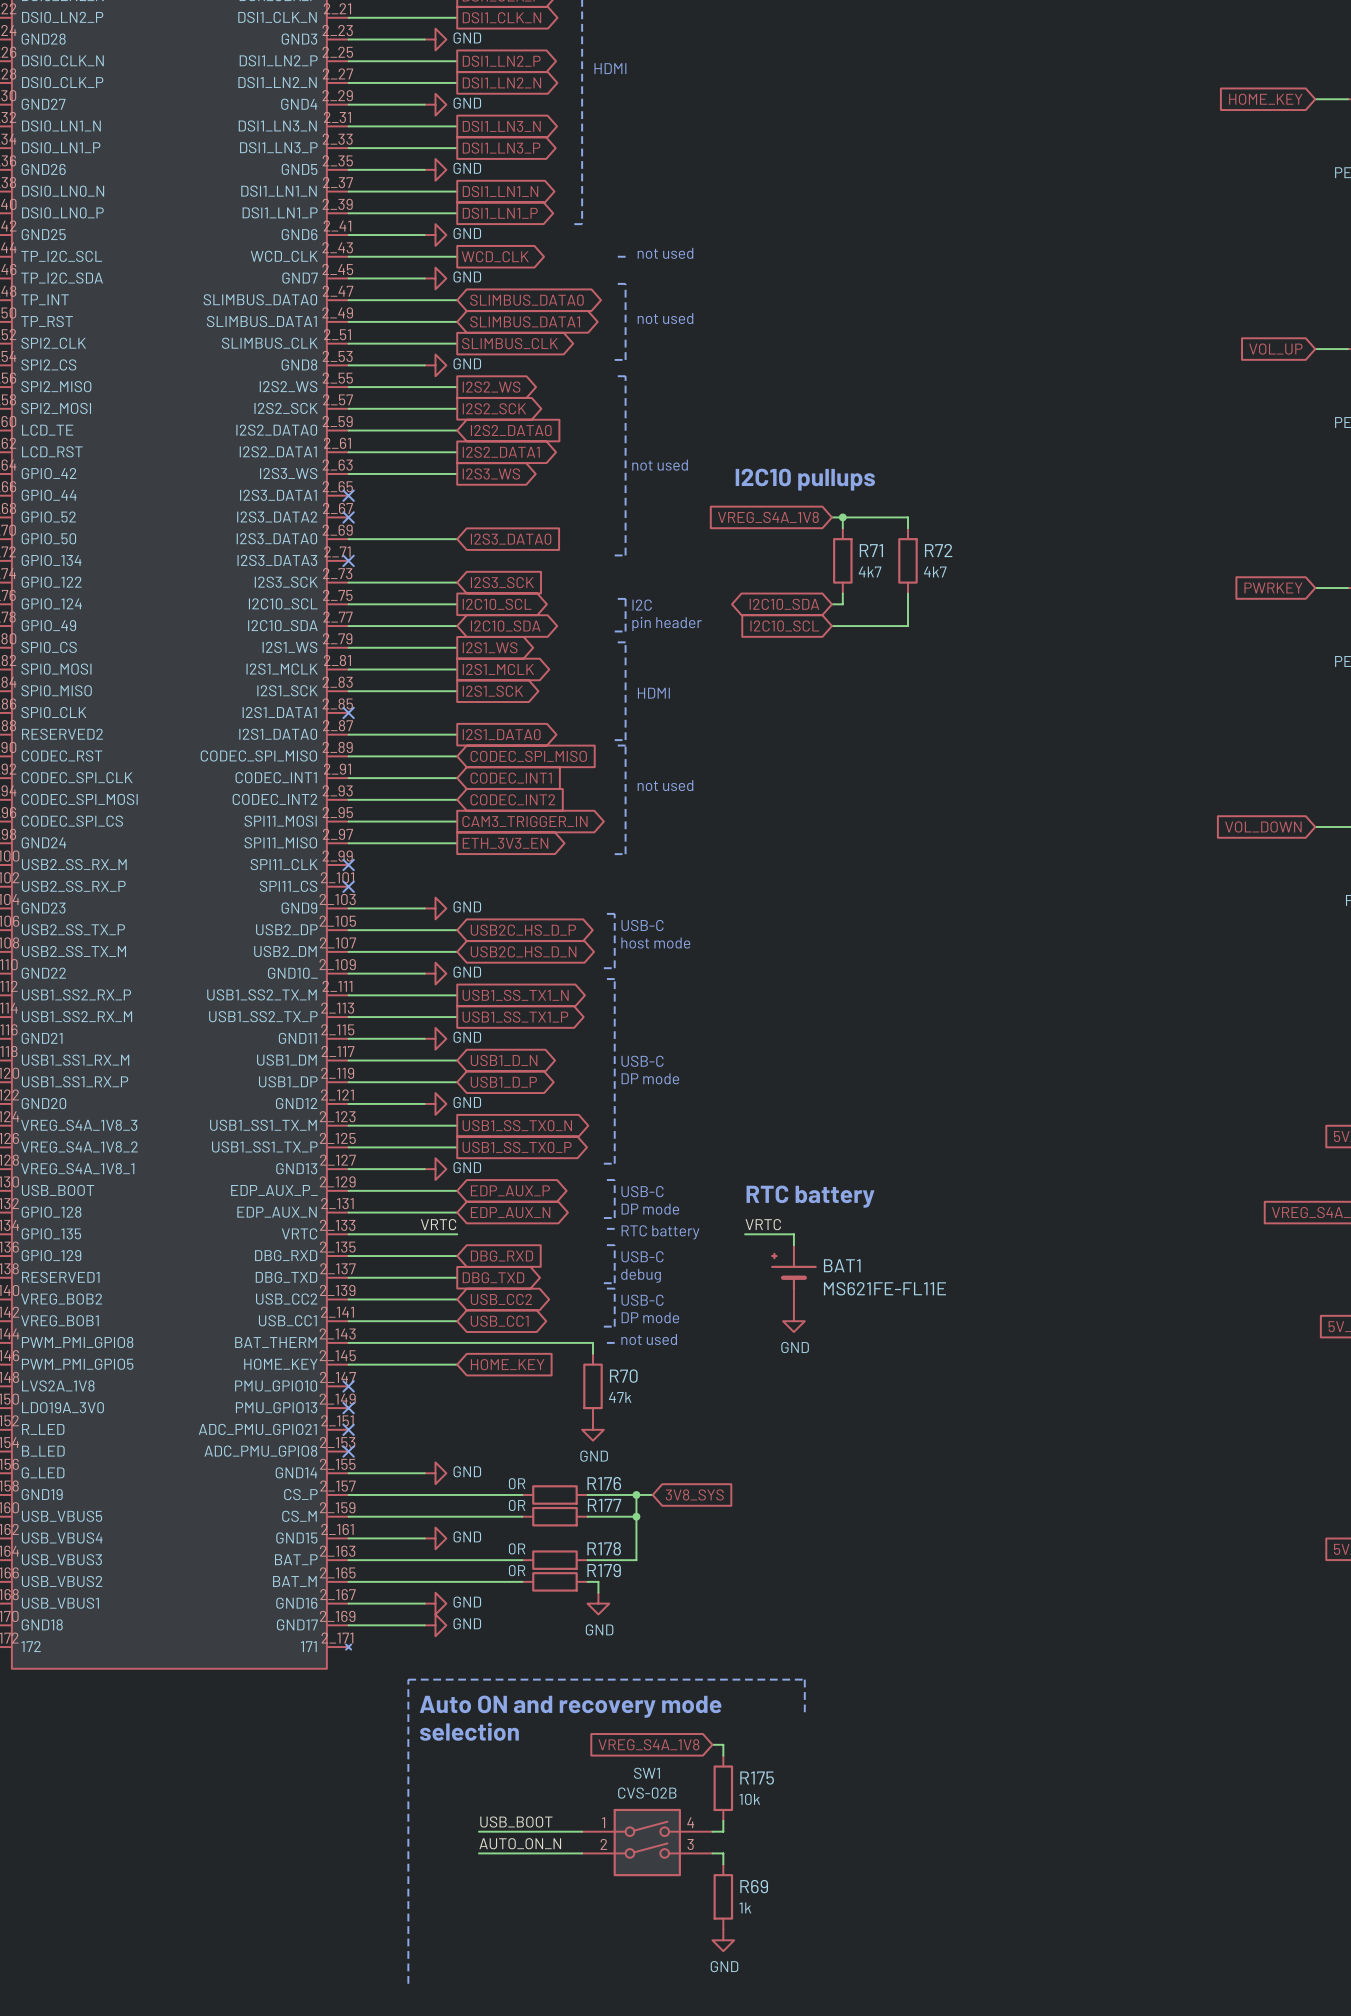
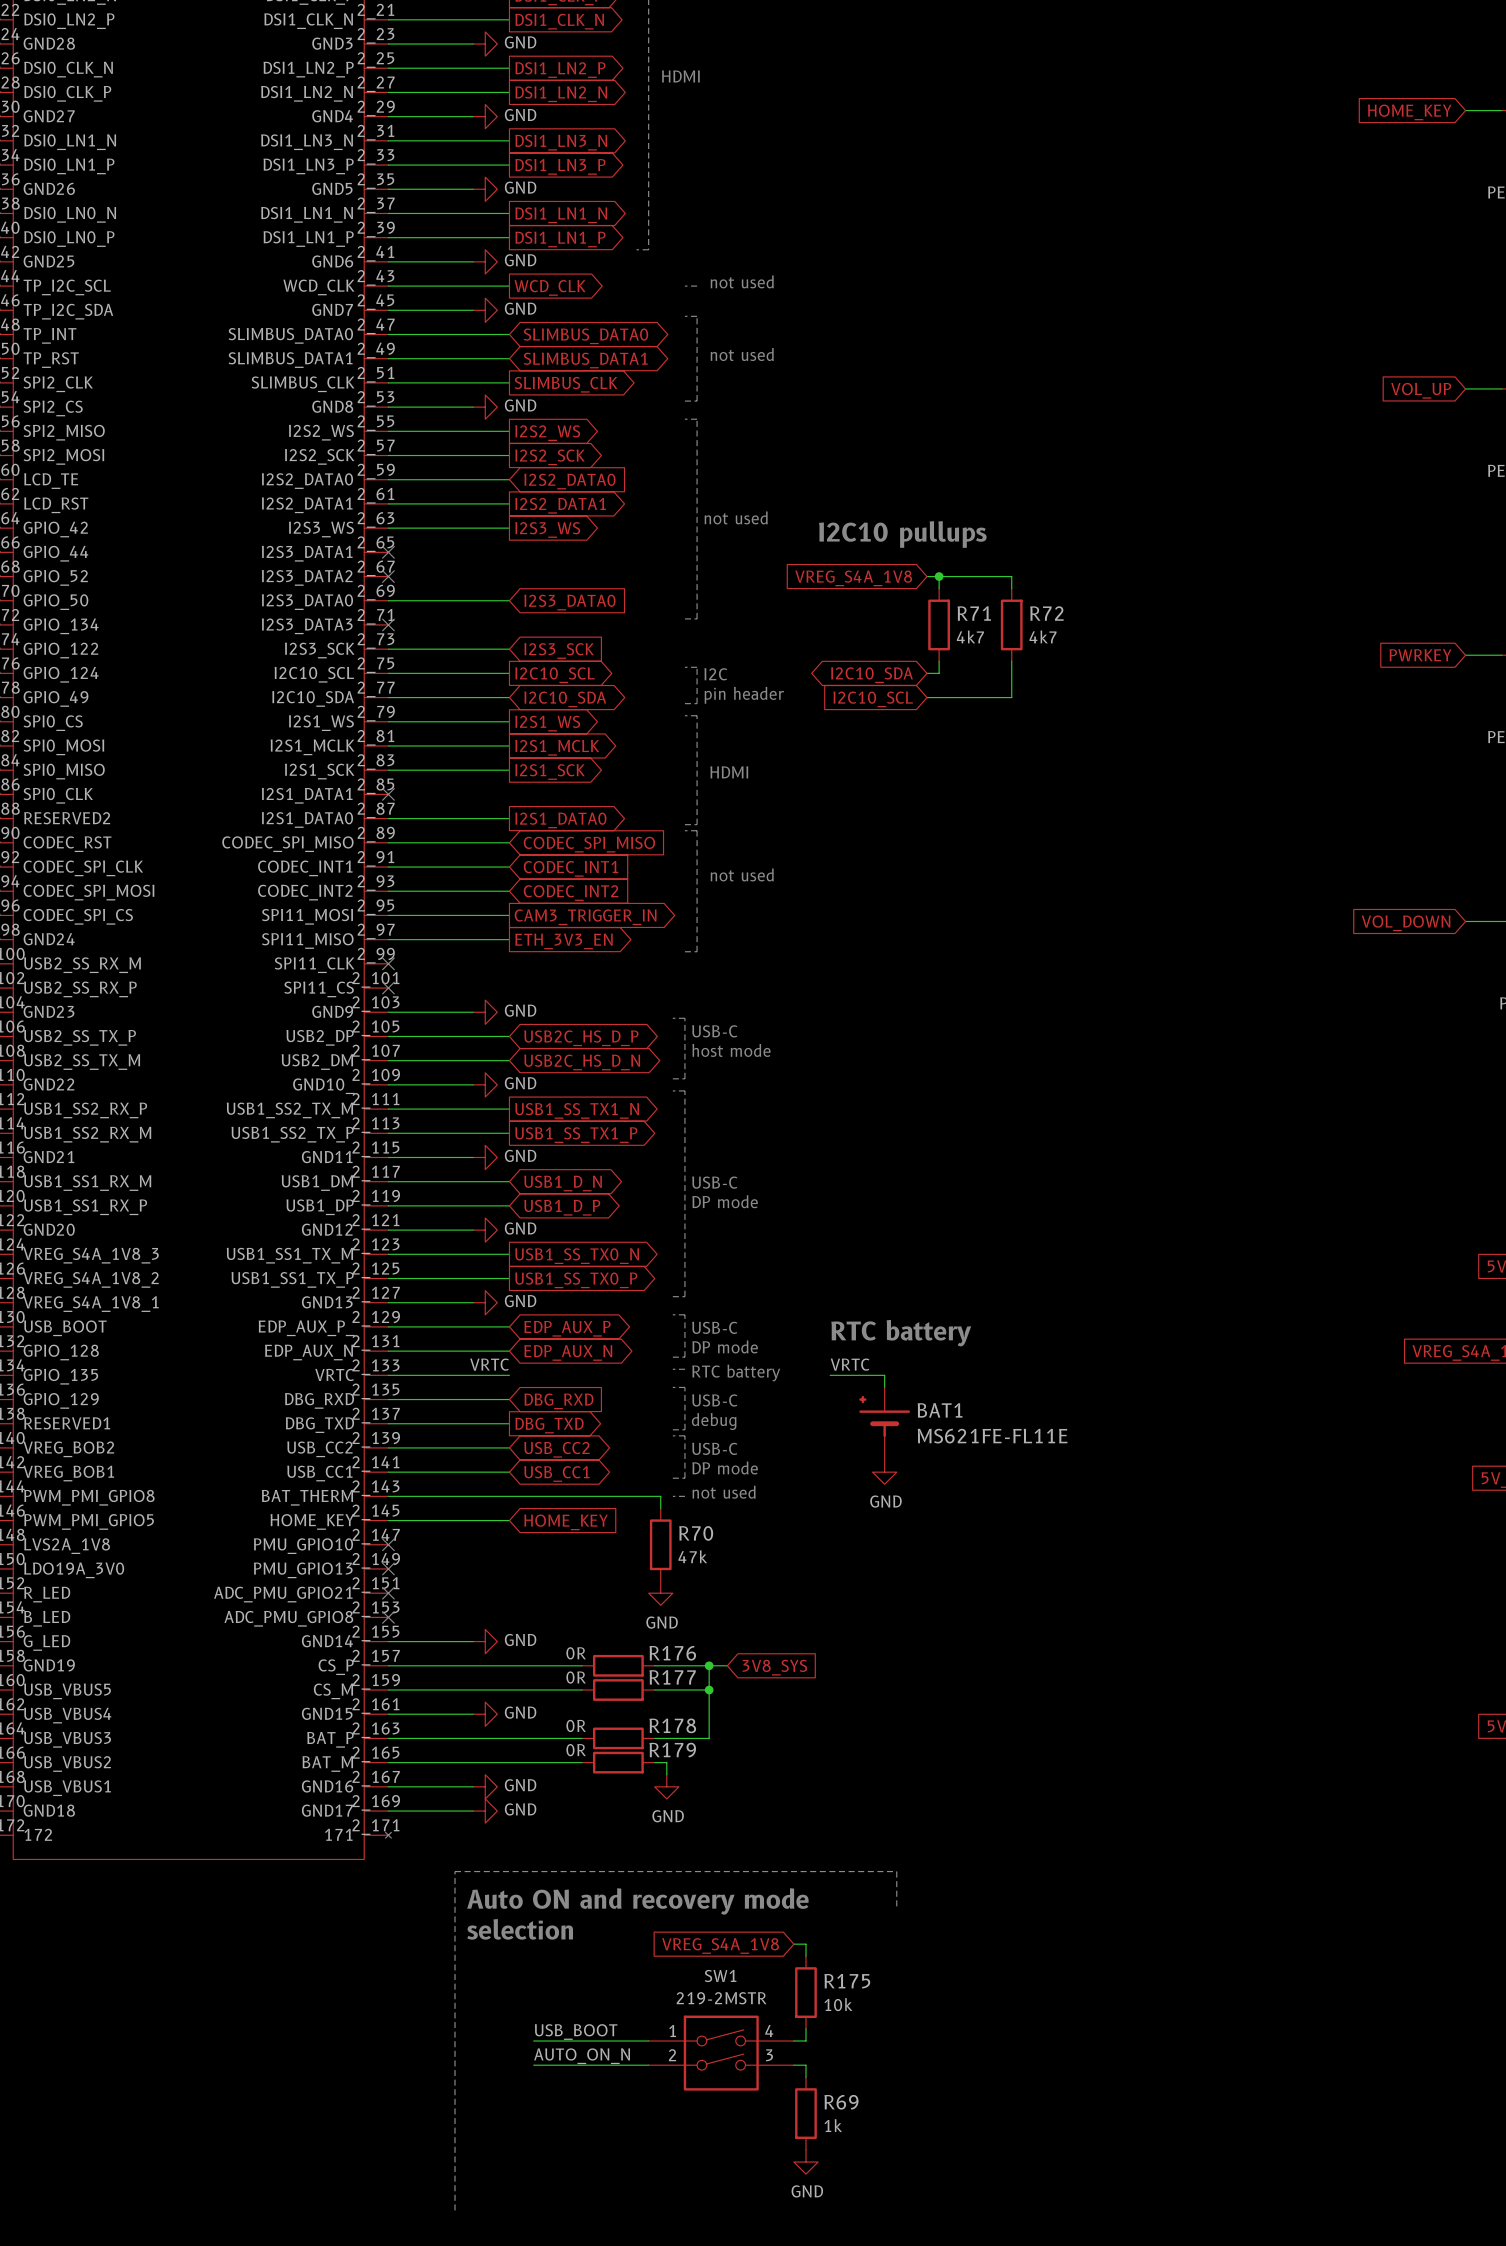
SW1 text: CVS-02B (647, 1793) -> 219-2MSTR (721, 1998)

